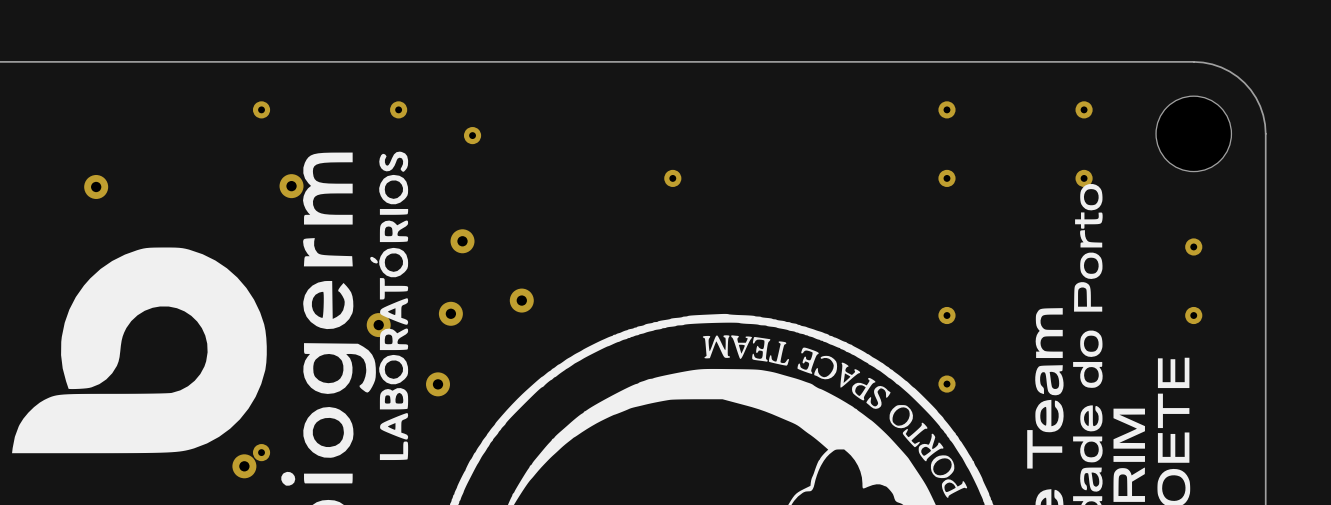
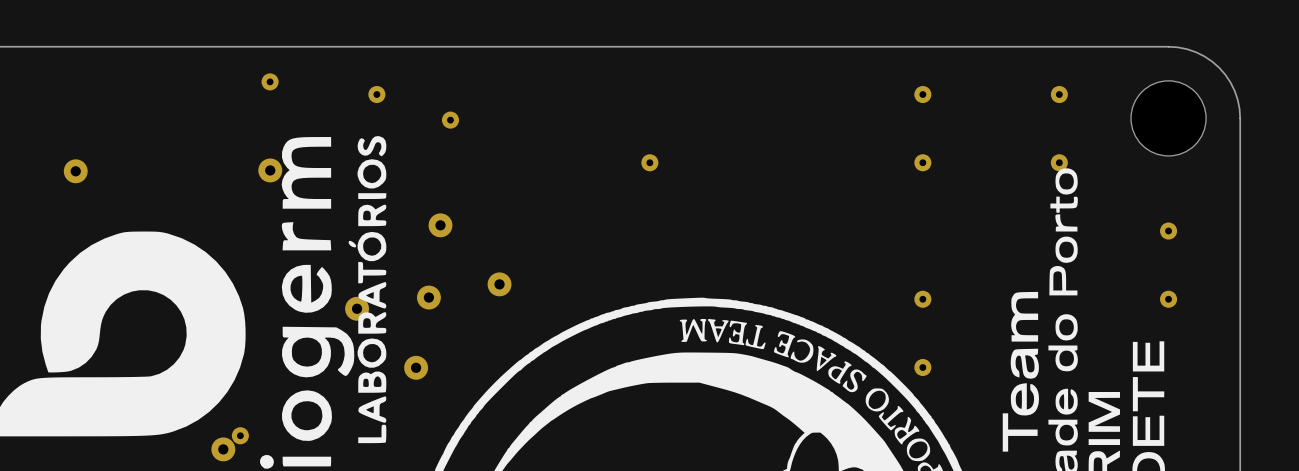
via position: (261, 109) -> (270, 81)

